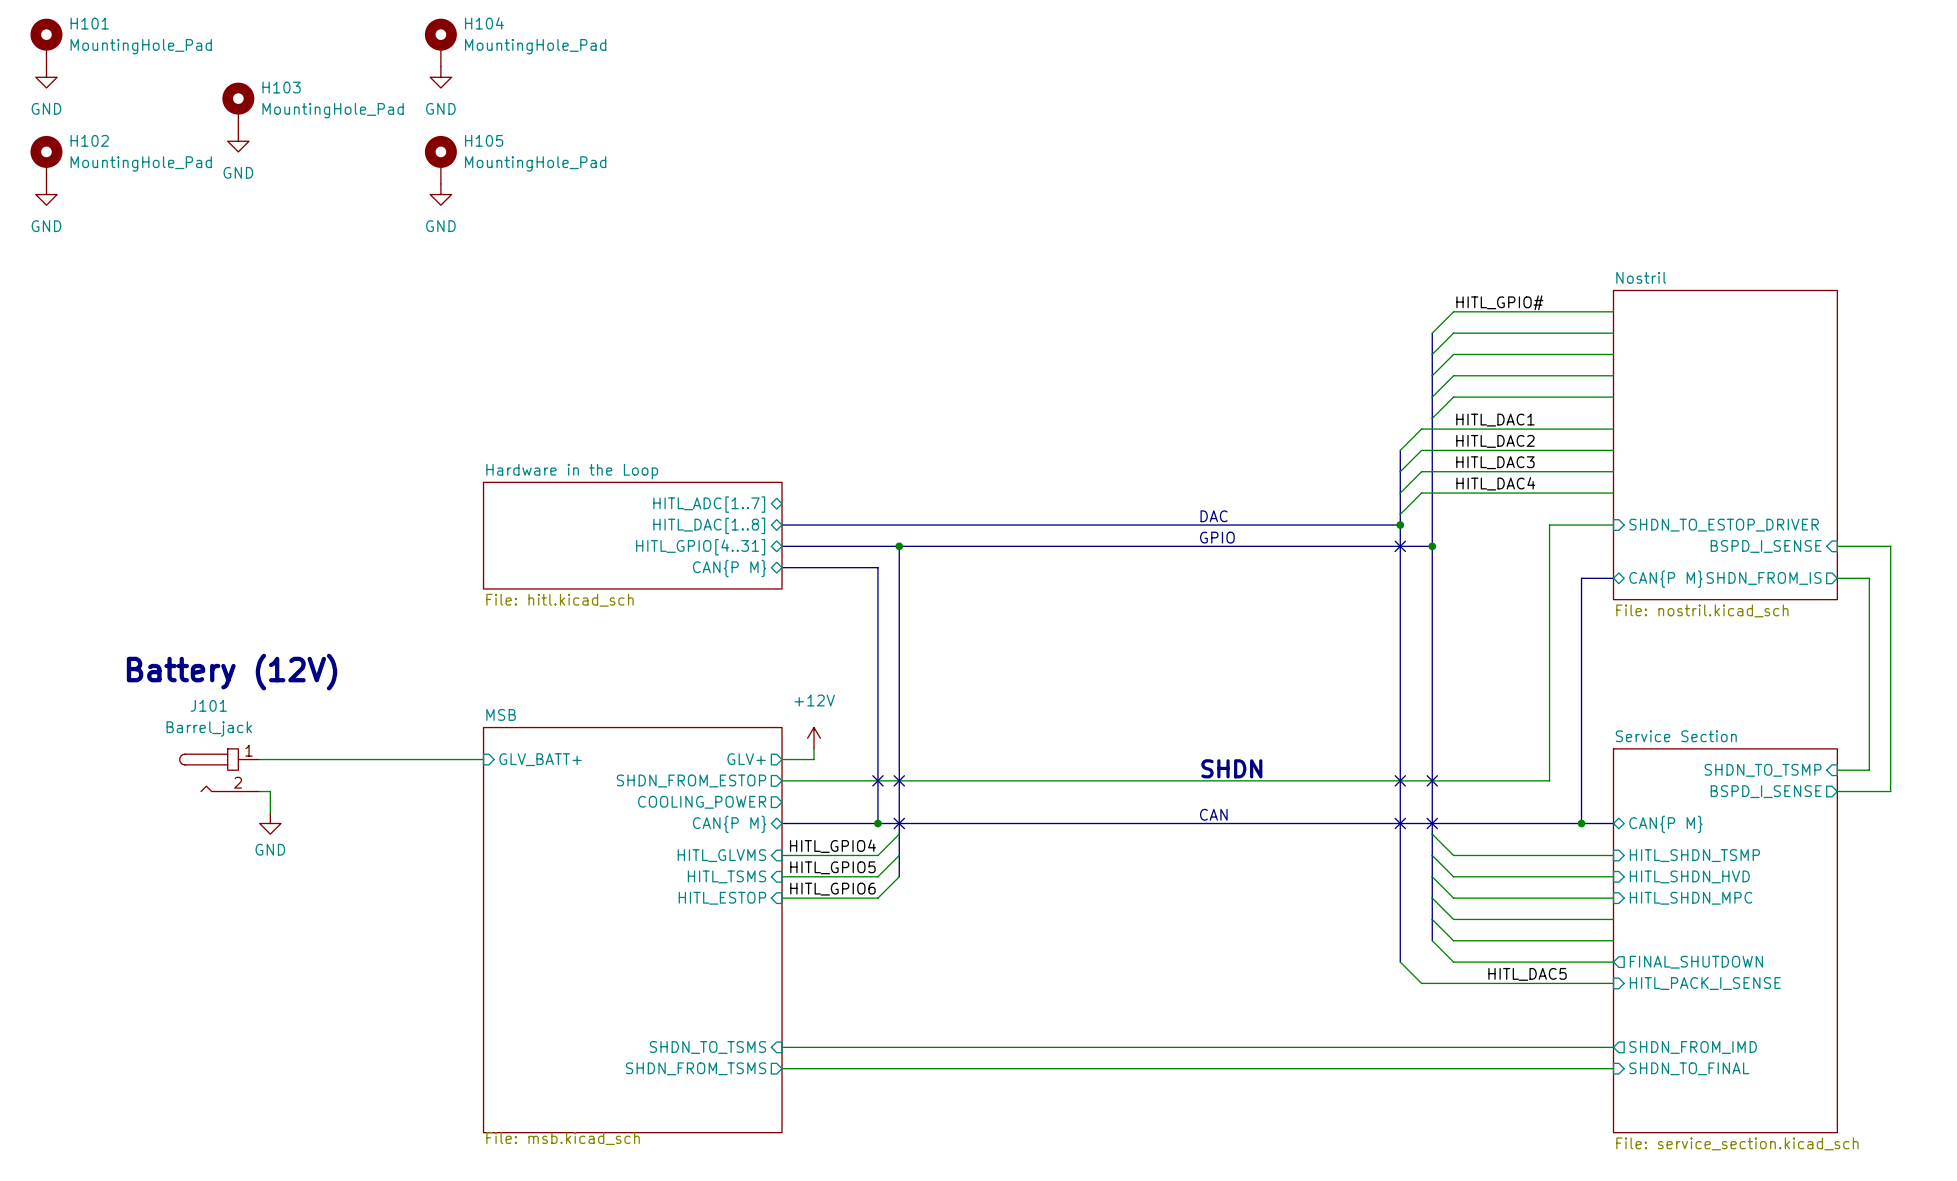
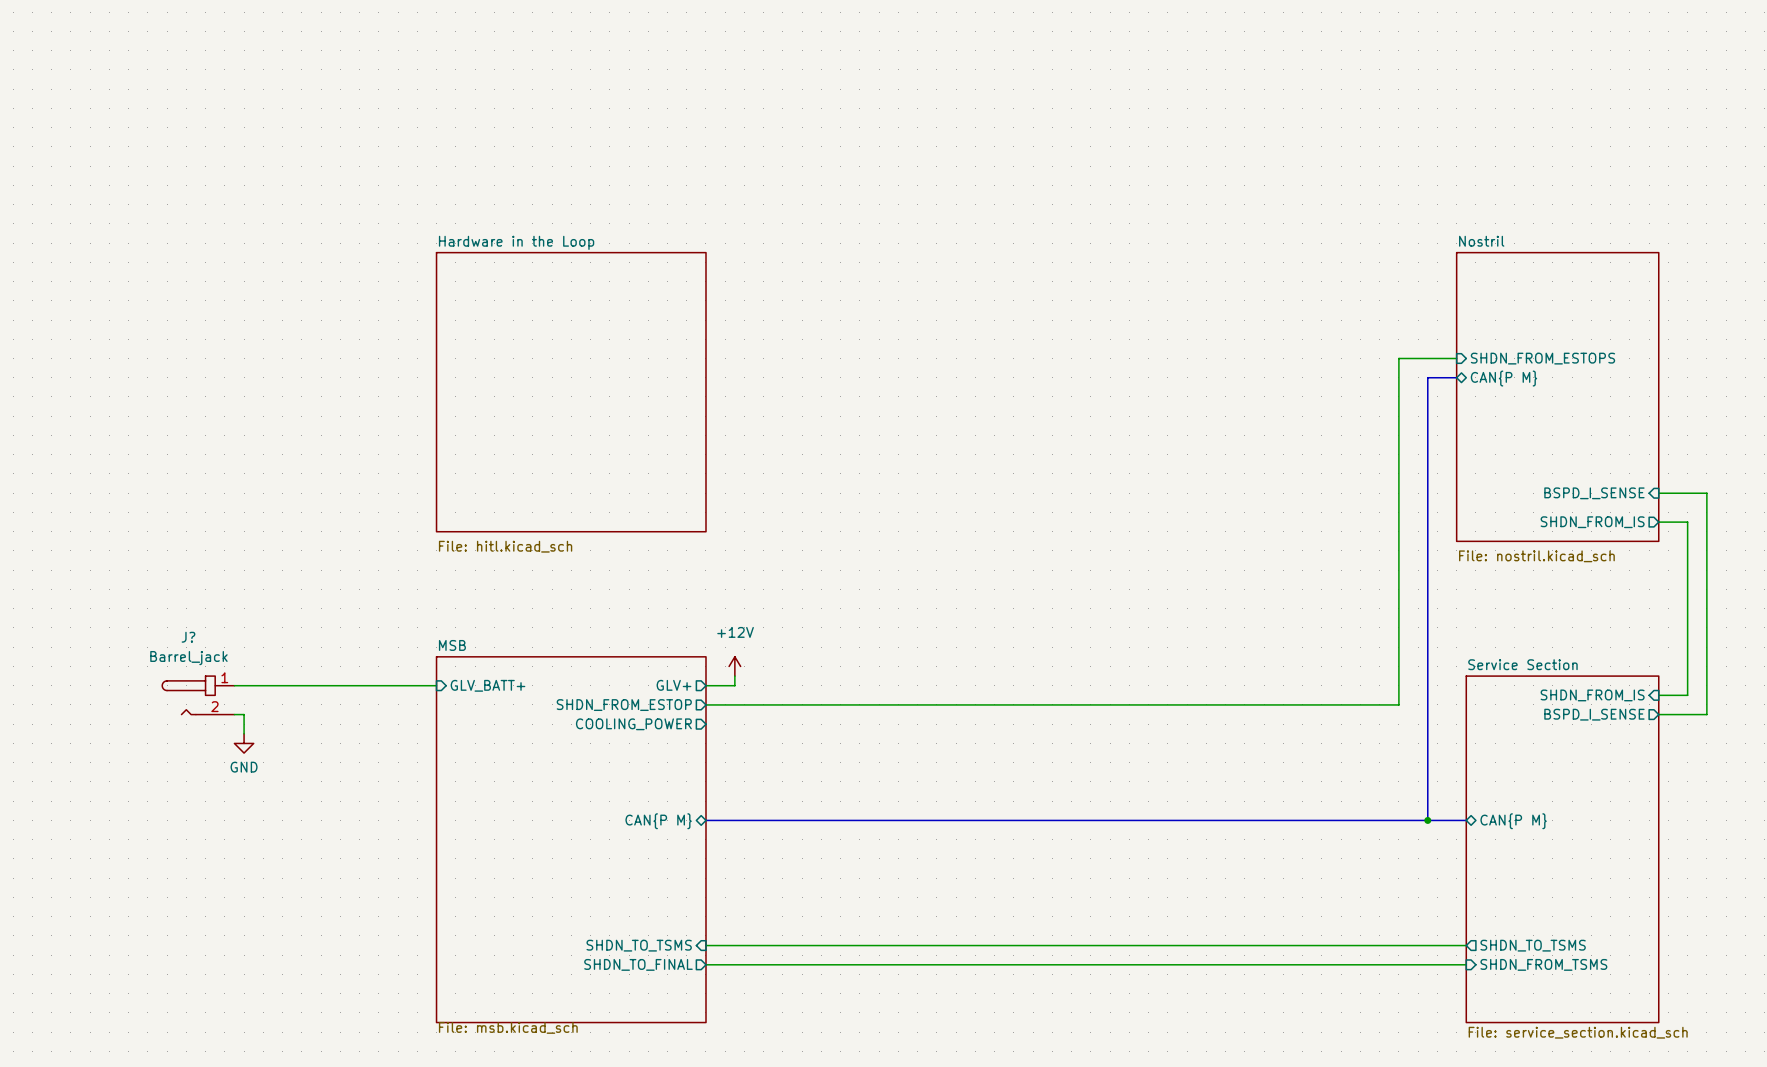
H101: MountingHole_Pad (46, 42) -> none
H104: MountingHole_Pad (440, 42) -> none
power symbol: GND (46, 77) -> none
power symbol: GND (440, 77) -> none
H103: MountingHole_Pad (238, 106) -> none
power symbol: GND (238, 141) -> none
H102: MountingHole_Pad (46, 159) -> none
H105: MountingHole_Pad (440, 159) -> none
power symbol: GND (46, 194) -> none
power symbol: GND (440, 194) -> none
sheet Nostril shape: [1612, 289, 1839, 601] -> [1456, 252, 1660, 542]
label: HITL_GPIO# (1499, 302) -> none
wire: (1613, 311) (1453, 311) (1432, 333) -> none
bus: (1432, 333) (1432, 940) -> none
wire: (1613, 333) (1453, 333) (1432, 354) -> none
wire: (1613, 354) (1453, 354) (1432, 375) -> none
wire: (1613, 375) (1453, 375) (1432, 397) -> none
wire: (1549, 397) (1453, 397) (1432, 418) -> none
sheet pin: none -> SHDN_FROM_ESTOPS (1542, 358)
label: HITL_DAC1 (1495, 420) -> none
wire: (1613, 429) (1421, 429) (1400, 450) -> none
sheet Hardware in the Loop: none -> File: hitl.kicad_sch (571, 392)
label: HITL_DAC2 (1495, 441) -> none
bus: (1400, 450) (1400, 962) -> none
wire: (1613, 450) (1421, 450) (1400, 471) -> none
label: HITL_DAC3 (1495, 462) -> none
wire: (1613, 471) (1421, 471) (1400, 493) -> none
label: HITL_DAC4 (1495, 483) -> none
wire: (1613, 493) (1421, 493) (1400, 514) -> none
sheet pin: HITL_ADC[1..7] (709, 504) -> none
text: DAC (1214, 516) -> none
sheet pin: HITL_DAC[1..8] (709, 525) -> none
bus: (782, 525) (1400, 525) -> none
junction: (1400, 525) -> none
wire: (1549, 525) (1613, 525) -> (1398, 473) (1398, 358)
sheet pin: SHDN_TO_ESTOP_DRIVER (1724, 525) -> none
sheet Hardware in the Loop: File: hitl.kicad_sch (632, 535) -> none
text: GPIO (1217, 537) -> none
bus: (782, 546) (1432, 546) -> none
bus: (899, 546) (899, 876) -> none
junction: (899, 546) -> none
no-connect mark: (1400, 546) -> none
junction: (1432, 546) -> none
sheet pin: HITL_GPIO[4..31] (700, 547) -> none
bus: (782, 567) (877, 567) (877, 823) -> none
sheet pin: CAN{P M} (729, 568) -> none
bus: (1581, 578) (1613, 578) -> (1427, 522) (1427, 377) (1456, 377)
sheet pin position: CAN{P M} (1665, 579) -> CAN{P M} (1504, 378)
text: Battery (12V) (232, 672) -> none
J101 name: J101 (208, 705) -> J? (188, 637)
sheet Service Section shape: [1612, 748, 1839, 1134] -> [1465, 675, 1660, 1024]
text: SHDN (1231, 768) -> none
sheet pin: SHDN_TO_TSMP (1763, 770) -> SHDN_FROM_IS (1592, 695)
no-connect mark: (877, 780) -> none
no-connect mark: (899, 780) -> none
no-connect mark: (1400, 780) -> none
no-connect mark: (1432, 780) -> none
text: CAN (1213, 814) -> none
bus: (782, 823) (1613, 823) -> none
junction: (877, 823) -> none
no-connect mark: (899, 823) -> none
no-connect mark: (1400, 823) -> none
no-connect mark: (1432, 823) -> none
bus: none -> (1427, 743) (1427, 820)
junction: (1581, 823) -> none
sheet pin position: CAN{P M} (729, 824) -> CAN{P M} (658, 821)
sheet pin position: CAN{P M} (1665, 824) -> CAN{P M} (1513, 821)
wire: (899, 834) (877, 855) (782, 855) -> none
wire: (1432, 834) (1453, 855) (1613, 855) -> none
label: HITL_GPIO4 (832, 846) -> none
sheet pin: HITL_GLVMS (721, 855) -> none
wire: (899, 855) (877, 876) (782, 876) -> none
wire: (1432, 855) (1453, 876) (1613, 876) -> none
sheet pin: HITL_SHDN_TSMP (1694, 855) -> none
label: HITL_GPIO5 (832, 867) -> none
sheet pin: HITL_TSMS (727, 876) -> none
wire: (899, 876) (877, 898) (782, 898) -> none
wire: (1432, 876) (1453, 898) (1613, 898) -> none
sheet pin: HITL_SHDN_HVD (1689, 876) -> none
label: HITL_GPIO6 (832, 889) -> none
sheet pin: HITL_ESTOP (722, 898) -> none
wire: (1432, 898) (1453, 919) (1613, 919) -> none
sheet pin: HITL_SHDN_MPC (1691, 898) -> none
bus: none -> (705, 820) (1466, 820)
junction: none -> (1427, 820)
wire: (1432, 919) (1453, 940) (1613, 940) -> none
wire: (1432, 940) (1453, 962) (1613, 962) -> none
wire: (1400, 962) (1421, 983) (1613, 983) -> none
sheet pin: FINAL_SHUTDOWN (1696, 962) -> none
label: HITL_DAC5 (1527, 974) -> none
sheet pin: HITL_PACK_I_SENSE (1705, 983) -> none
wire: none -> (1456, 945) (1466, 945)
sheet pin shape: output (1693, 1047) -> input (1543, 964)
sheet pin: SHDN_FROM_IMD (1693, 1047) -> SHDN_FROM_TSMS (1543, 964)
sheet pin: SHDN_FROM_TSMS (696, 1068) -> SHDN_TO_FINAL (638, 964)
wire: none -> (1456, 964) (1466, 964)
sheet pin shape: input (1689, 1068) -> output (1533, 945)
sheet pin: SHDN_TO_FINAL (1689, 1068) -> SHDN_TO_TSMS (1533, 945)

